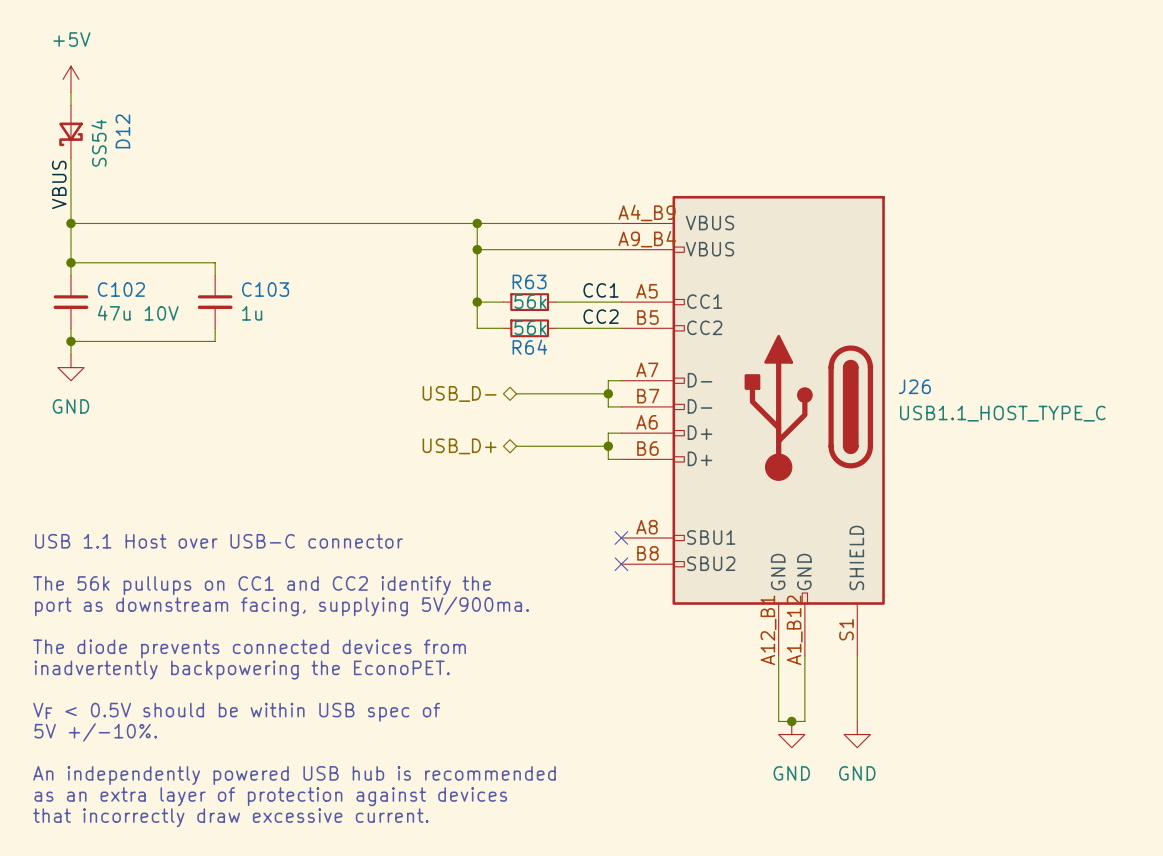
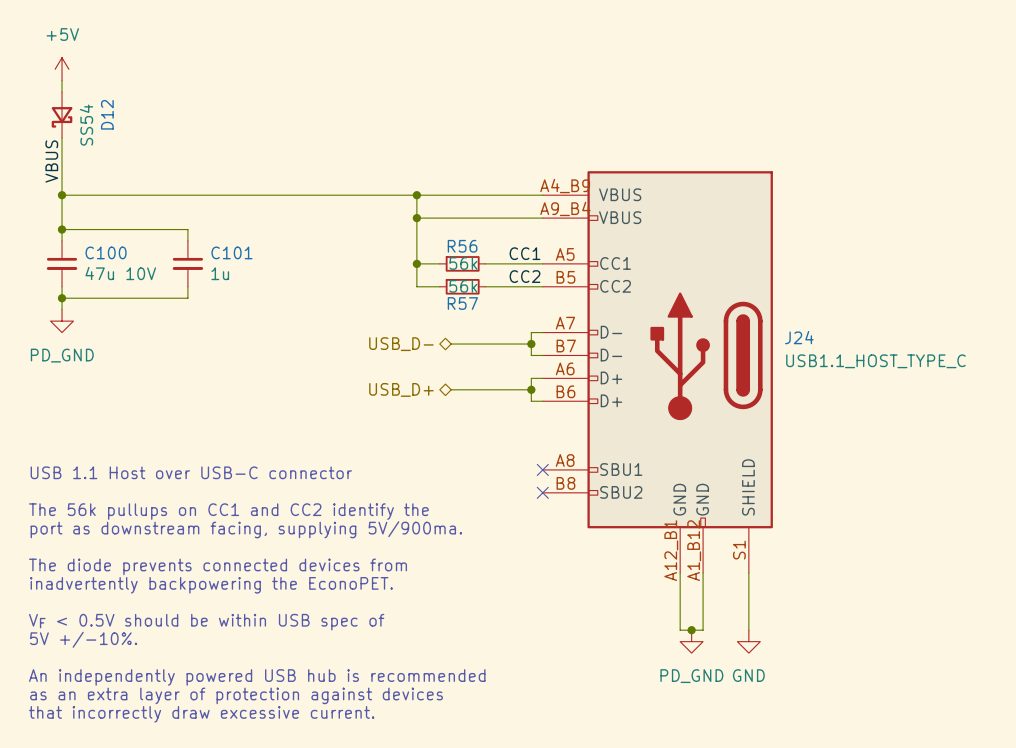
R63 name: R63 (529, 281) -> R56 (462, 246)
C102 name: C102 (121, 289) -> C100 (106, 252)
C103 name: C103 (265, 289) -> C101 (231, 252)
R64 name: R64 (529, 347) -> R57 (462, 303)
power symbol: GND (70, 367) -> PD_GND (62, 321)
J26 name: J26 (914, 386) -> J24 (799, 337)
power symbol: GND (791, 734) -> PD_GND (691, 641)

